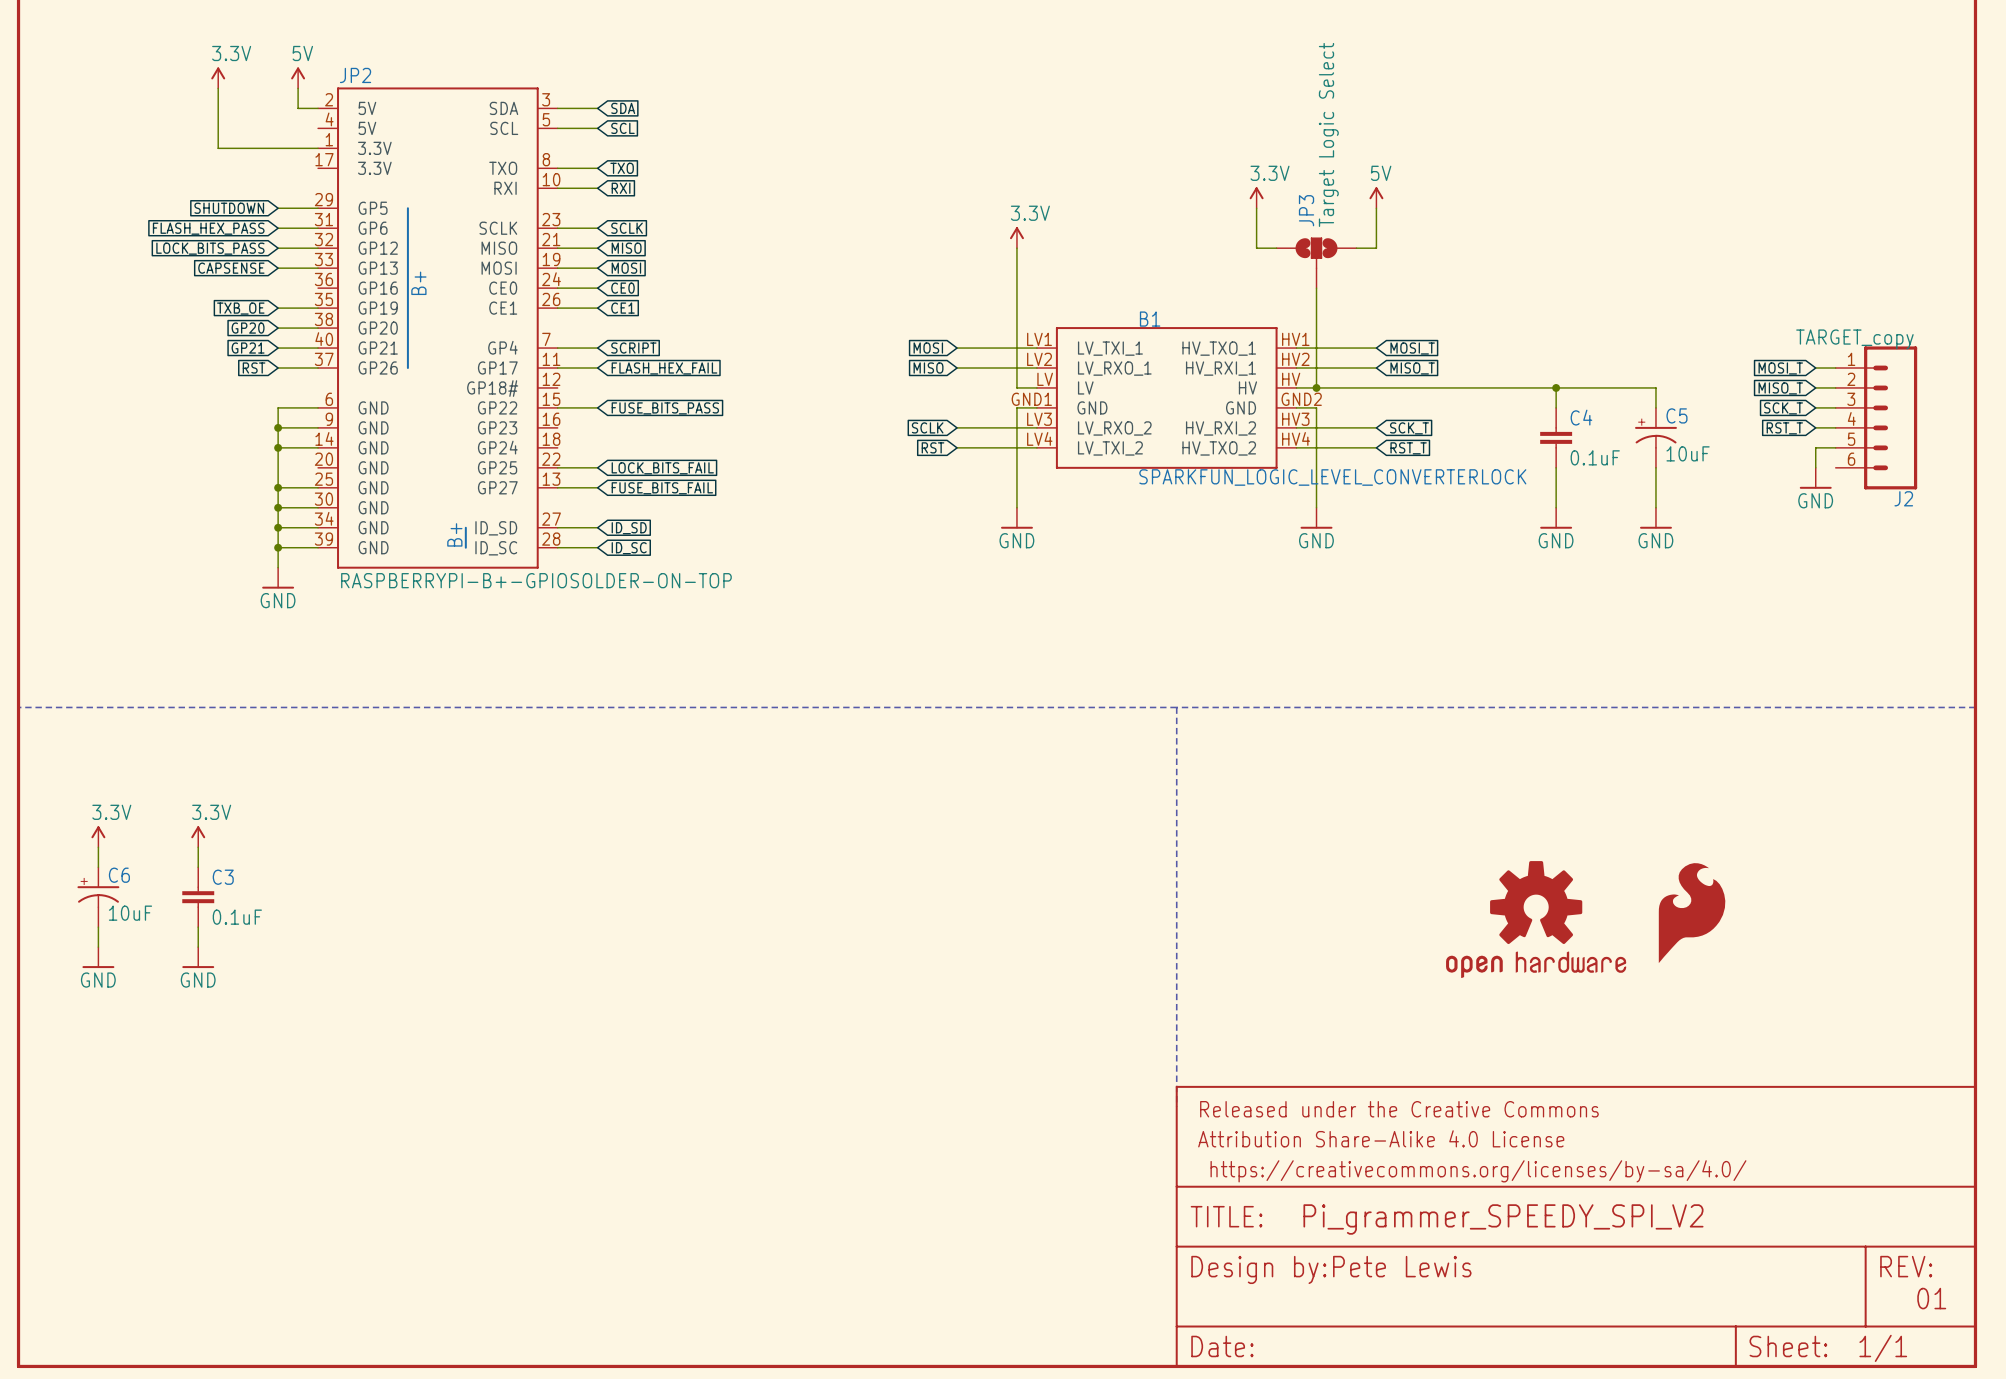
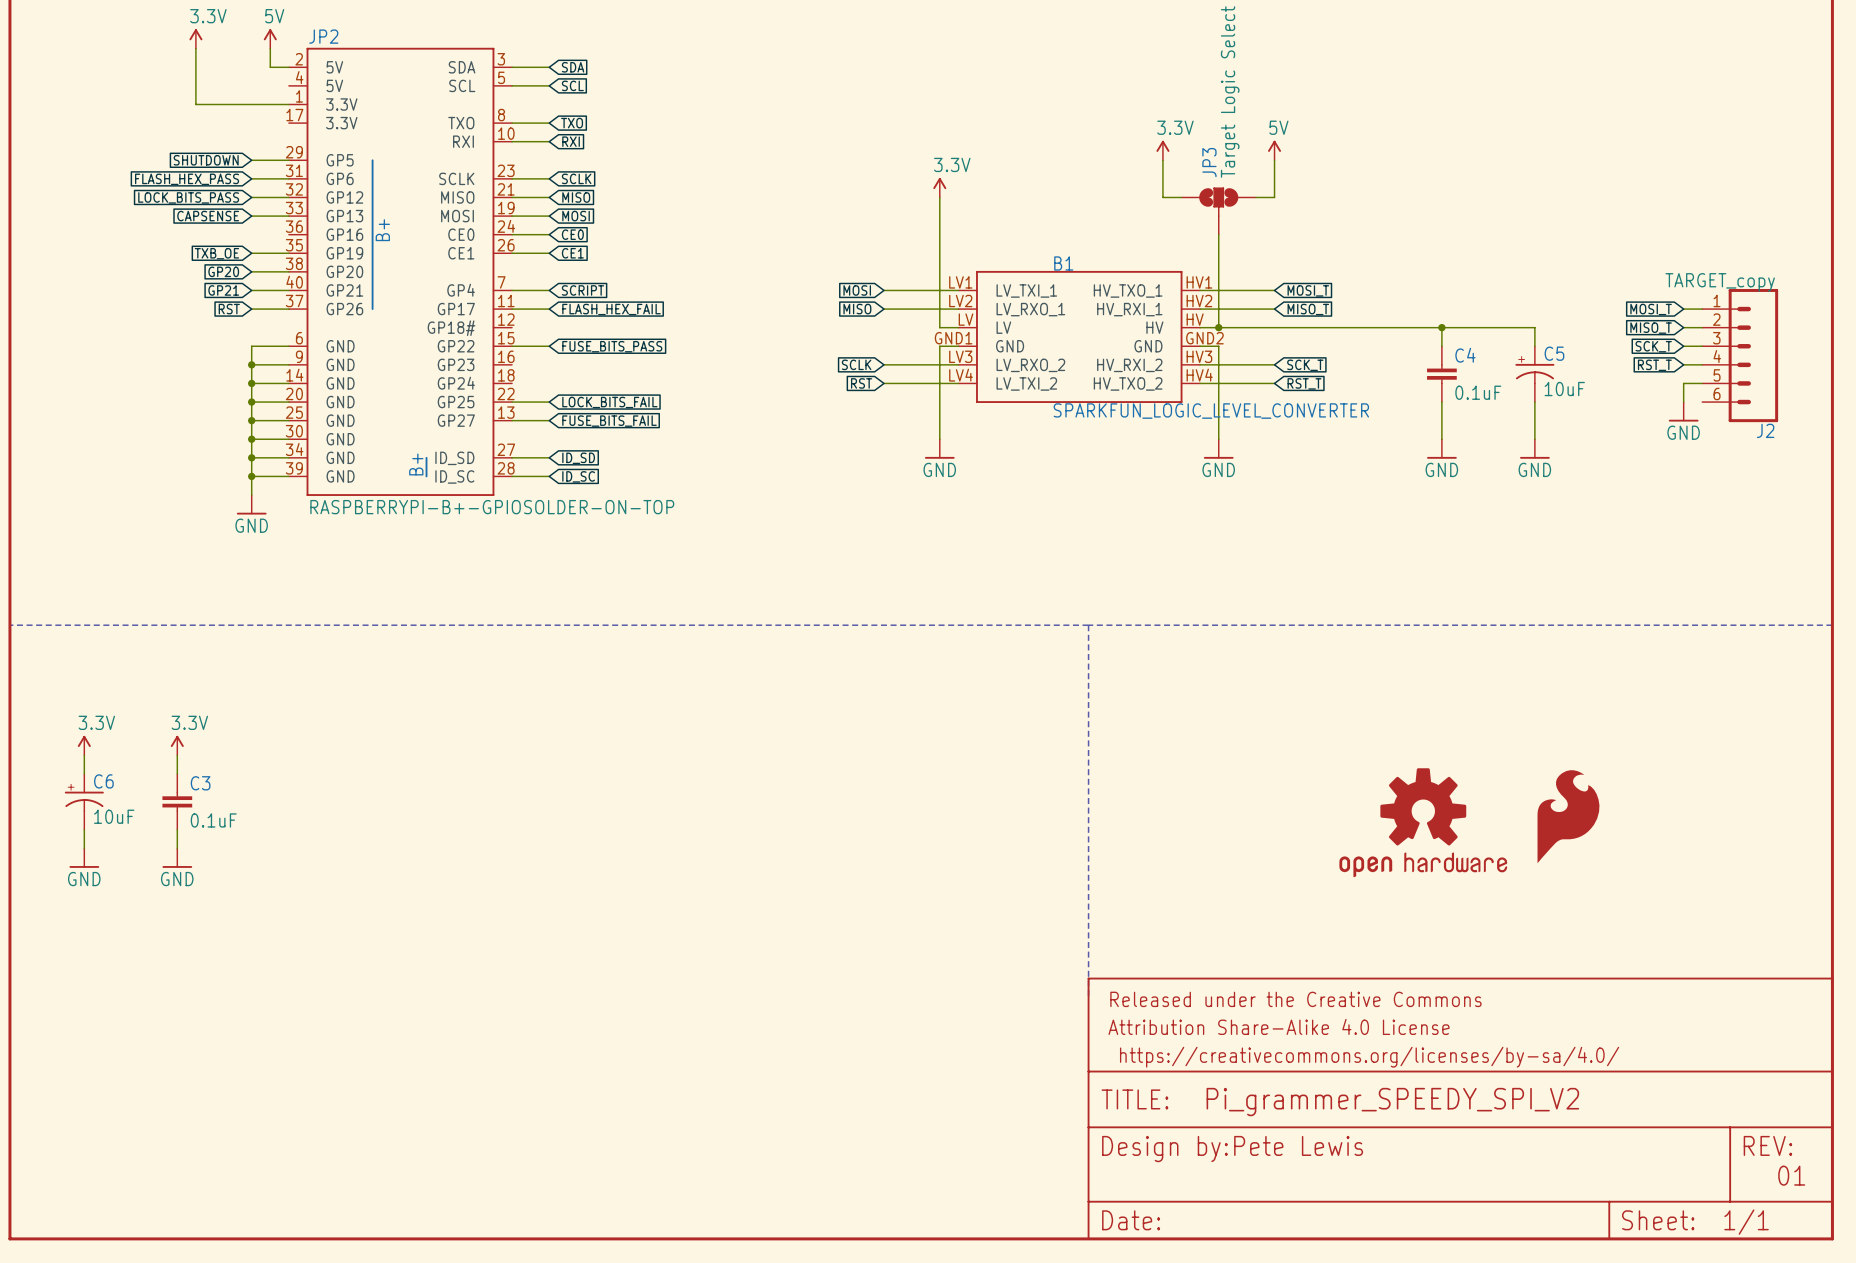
wire: none -> (251, 402) (288, 402)
junction: none -> (251, 402)
B1 value: SPARKFUN_LOGIC_LEVEL_CONVERTERLOCK (1332, 477) -> SPARKFUN_LOGIC_LEVEL_CONVERTER (1211, 411)

